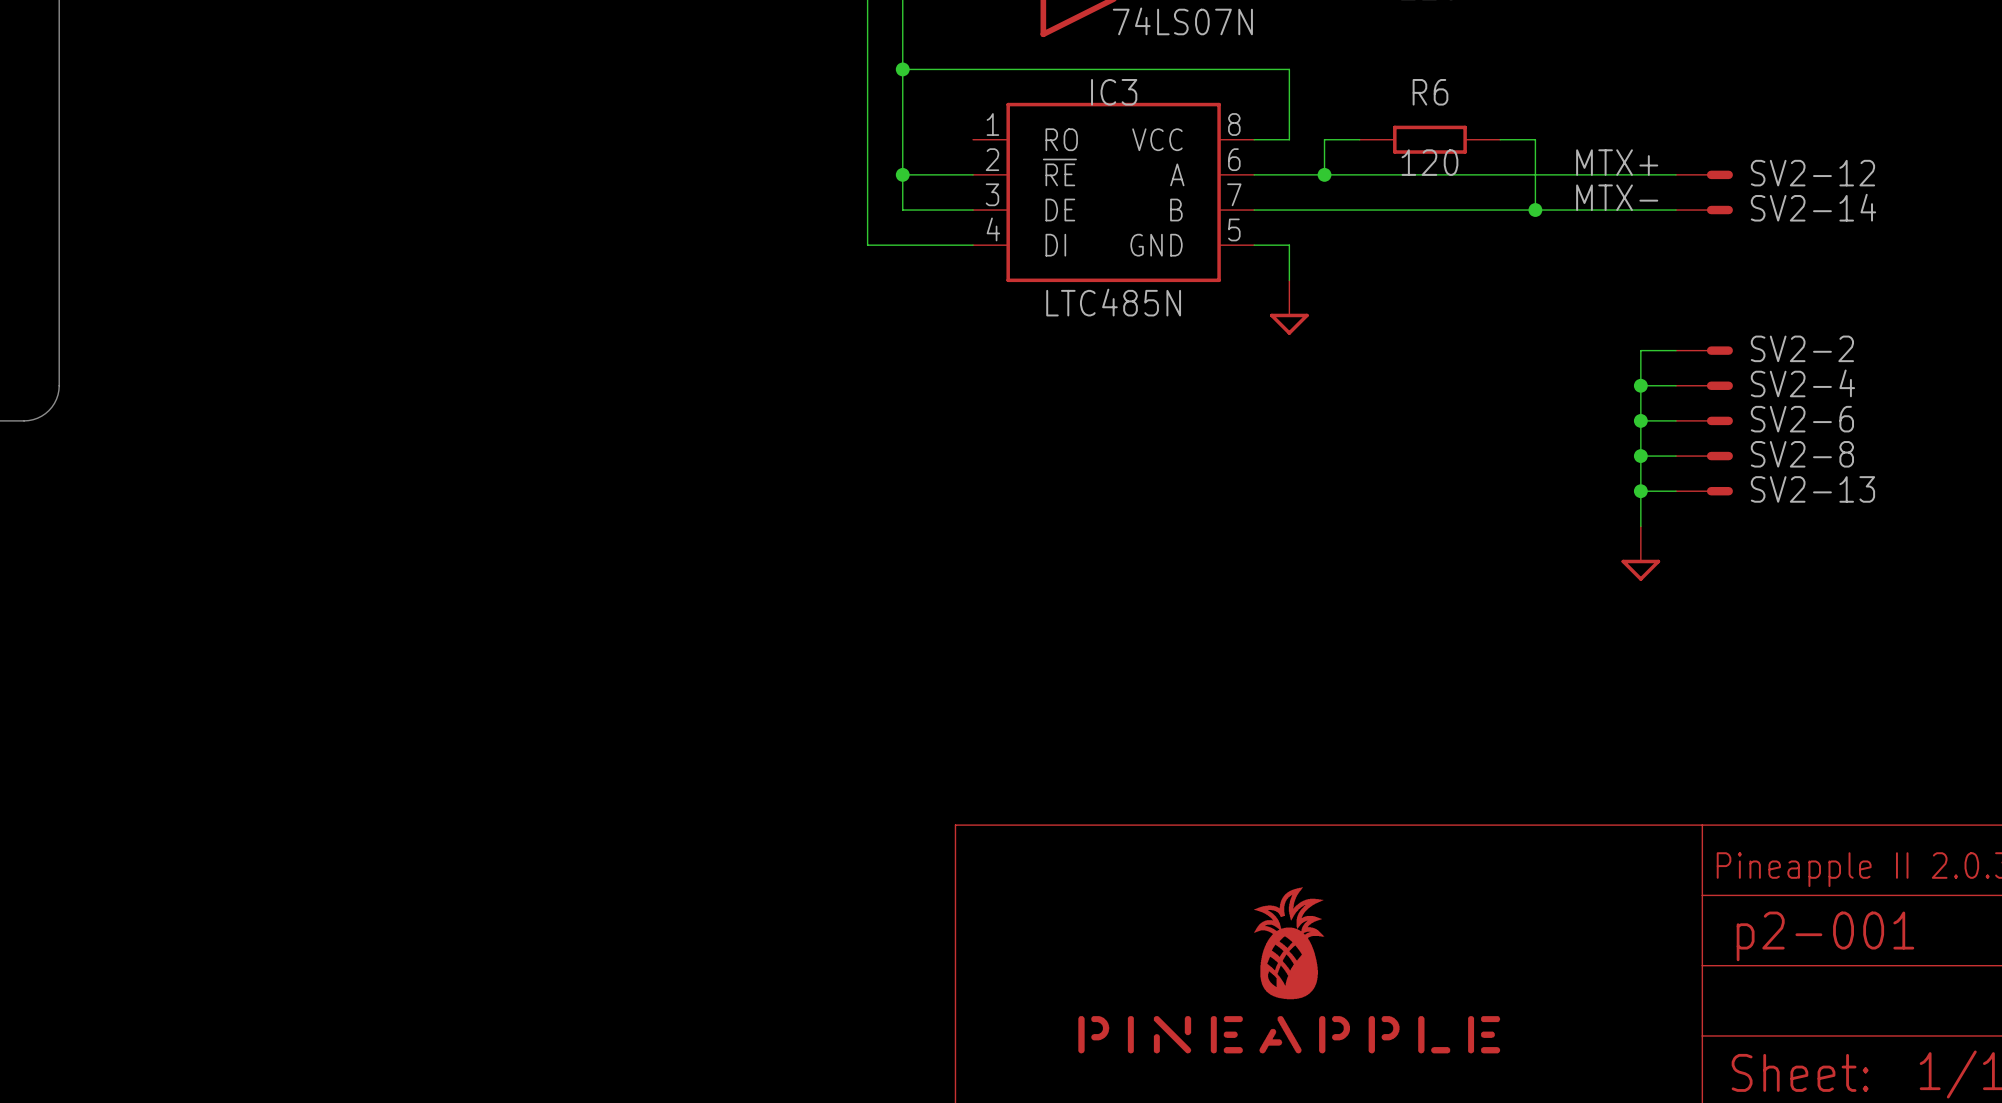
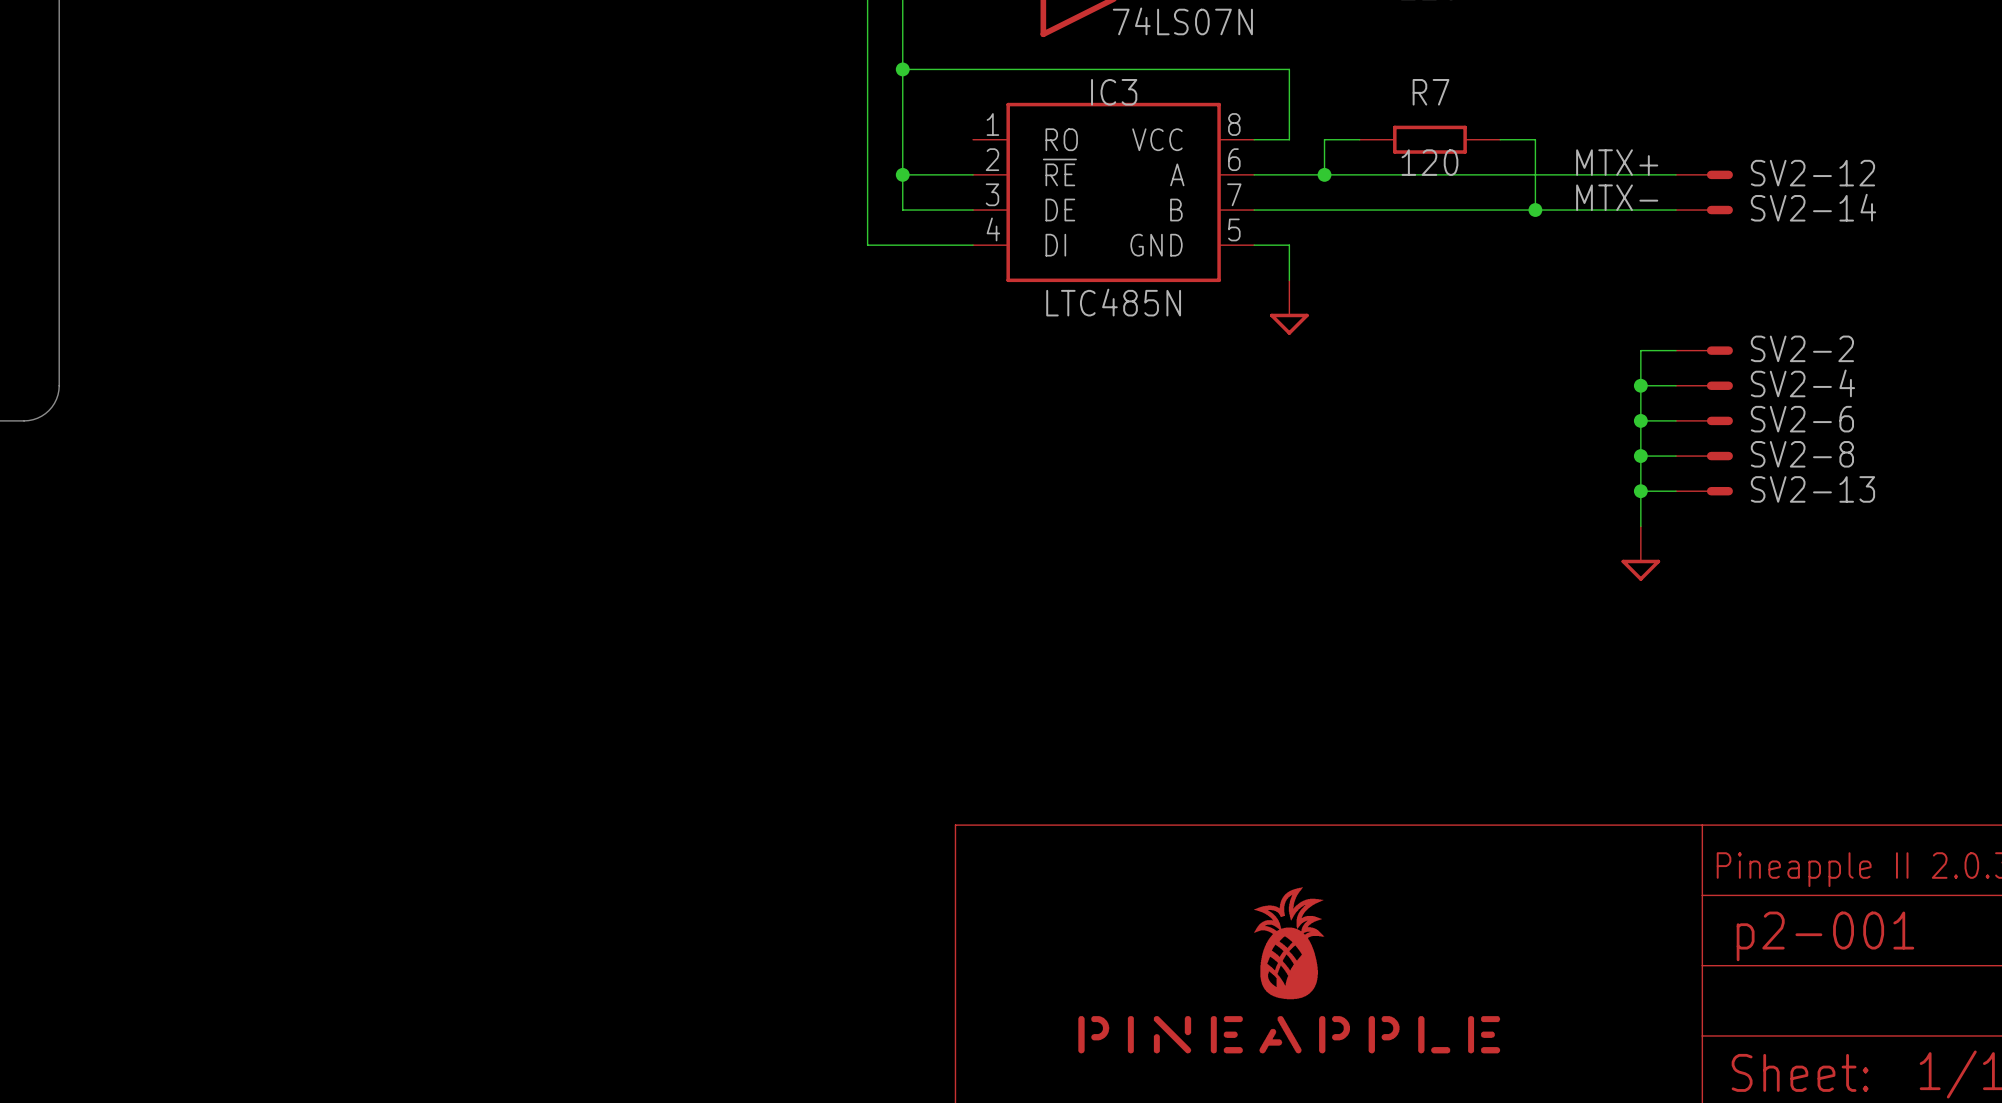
R6 name: R6 (1430, 92) -> R7 (1431, 92)

